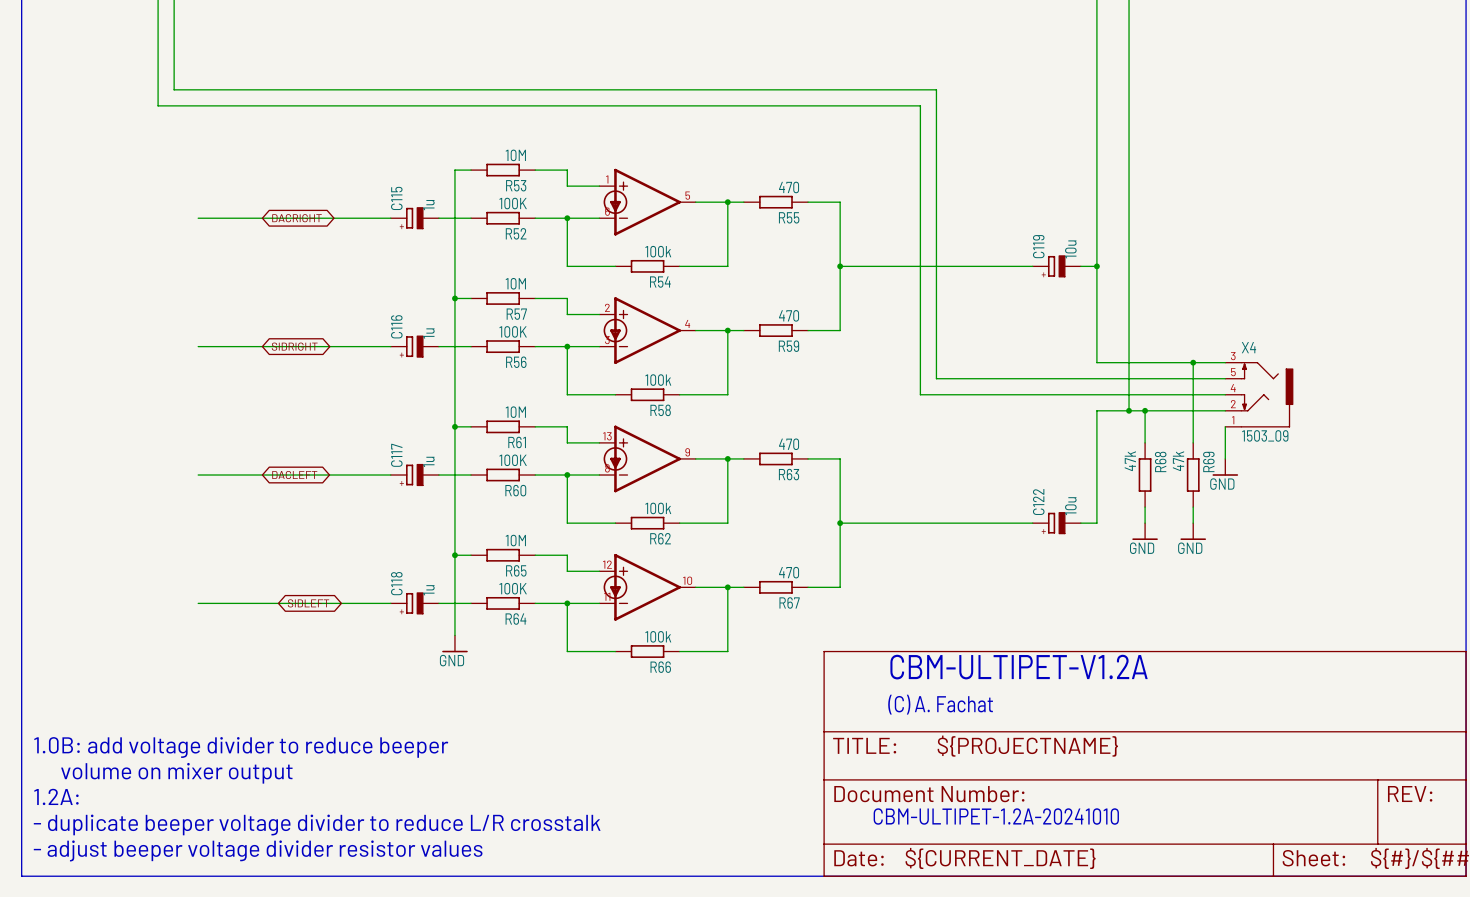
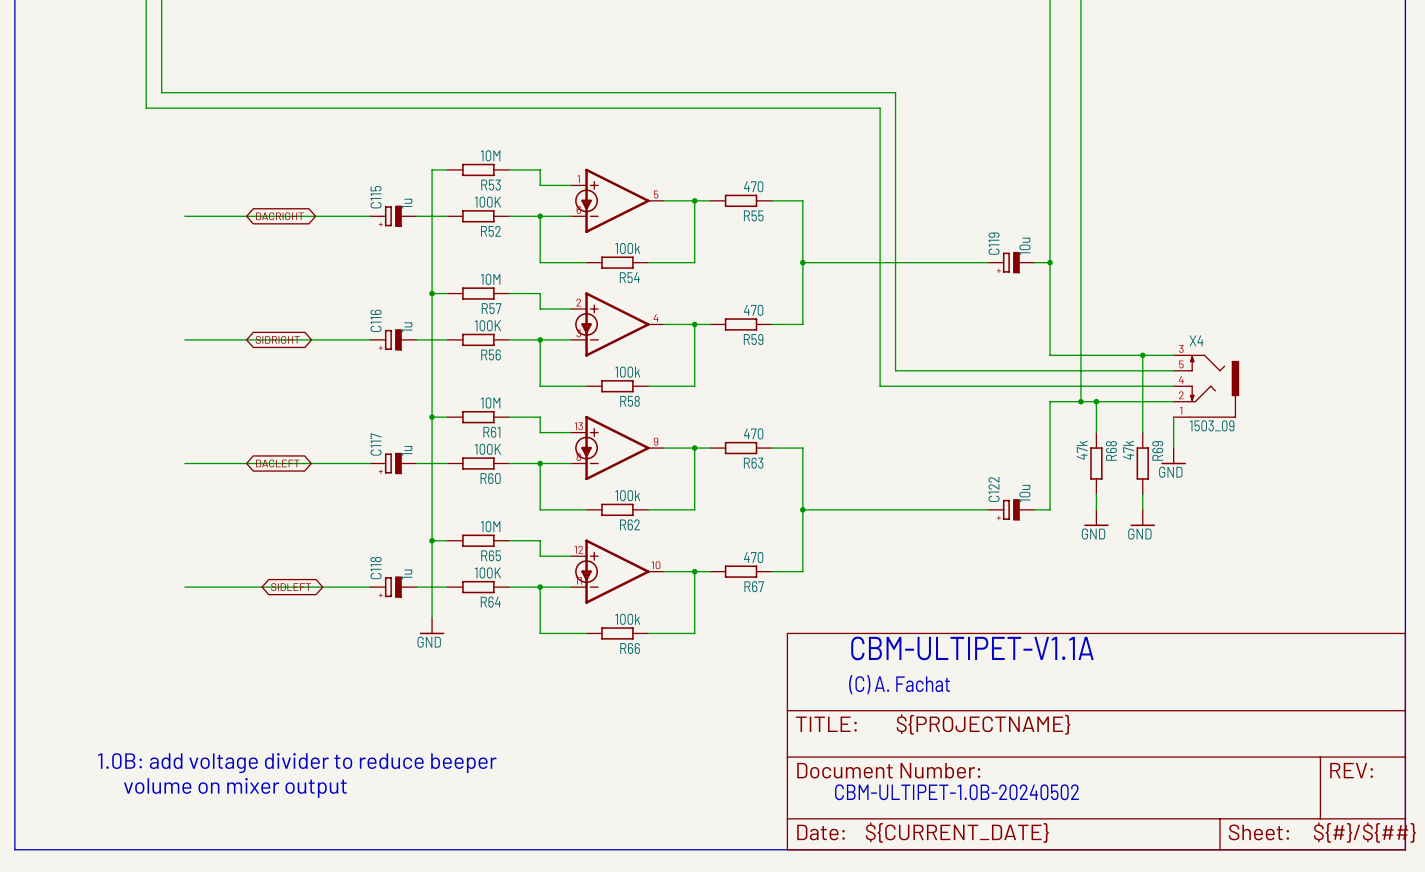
text: CBM-ULTIPET-V1.2A (1019, 667) -> CBM-ULTIPET-V1.1A (972, 648)
text position: 1.0B: add voltage divider to reduce beeper (241, 747) -> 1.0B: add voltage divider to reduce beeper (297, 763)
text position: volume on mixer output (176, 773) -> volume on mixer output (235, 787)
text: 1.2A: (56, 796) -> none
text: CBM-ULTIPET-1.2A-20241010 (996, 816) -> CBM-ULTIPET-1.0B-20240502 (957, 792)
text: - duplicate beeper voltage divider to reduce L/R crosstalk (317, 825) -> none
text: - adjust beeper voltage divider resistor values (258, 850) -> none

